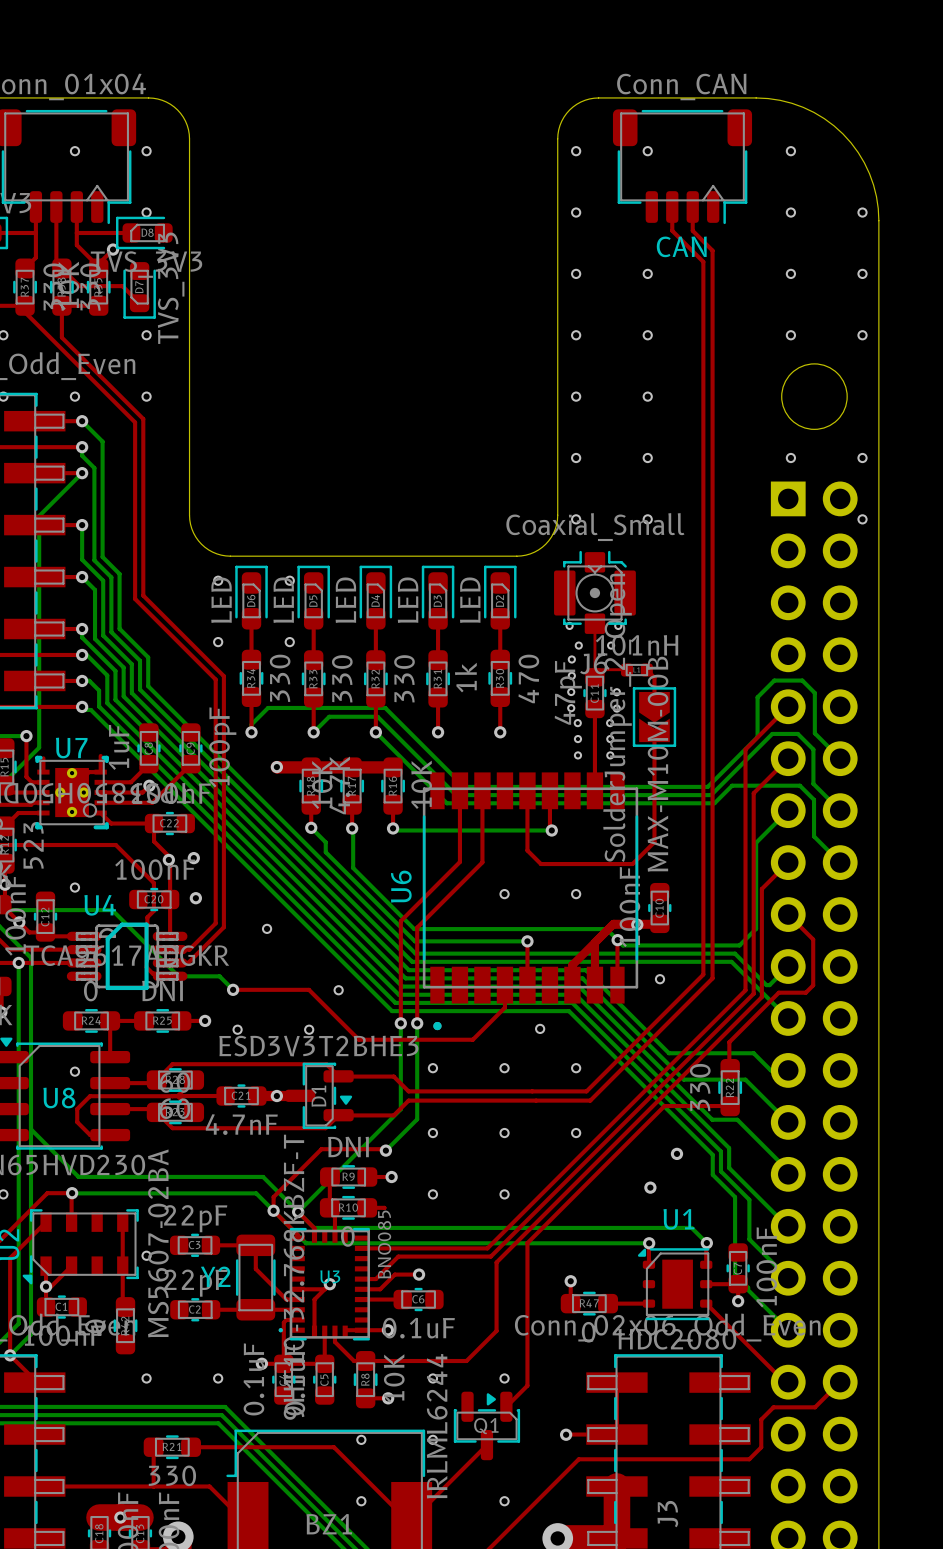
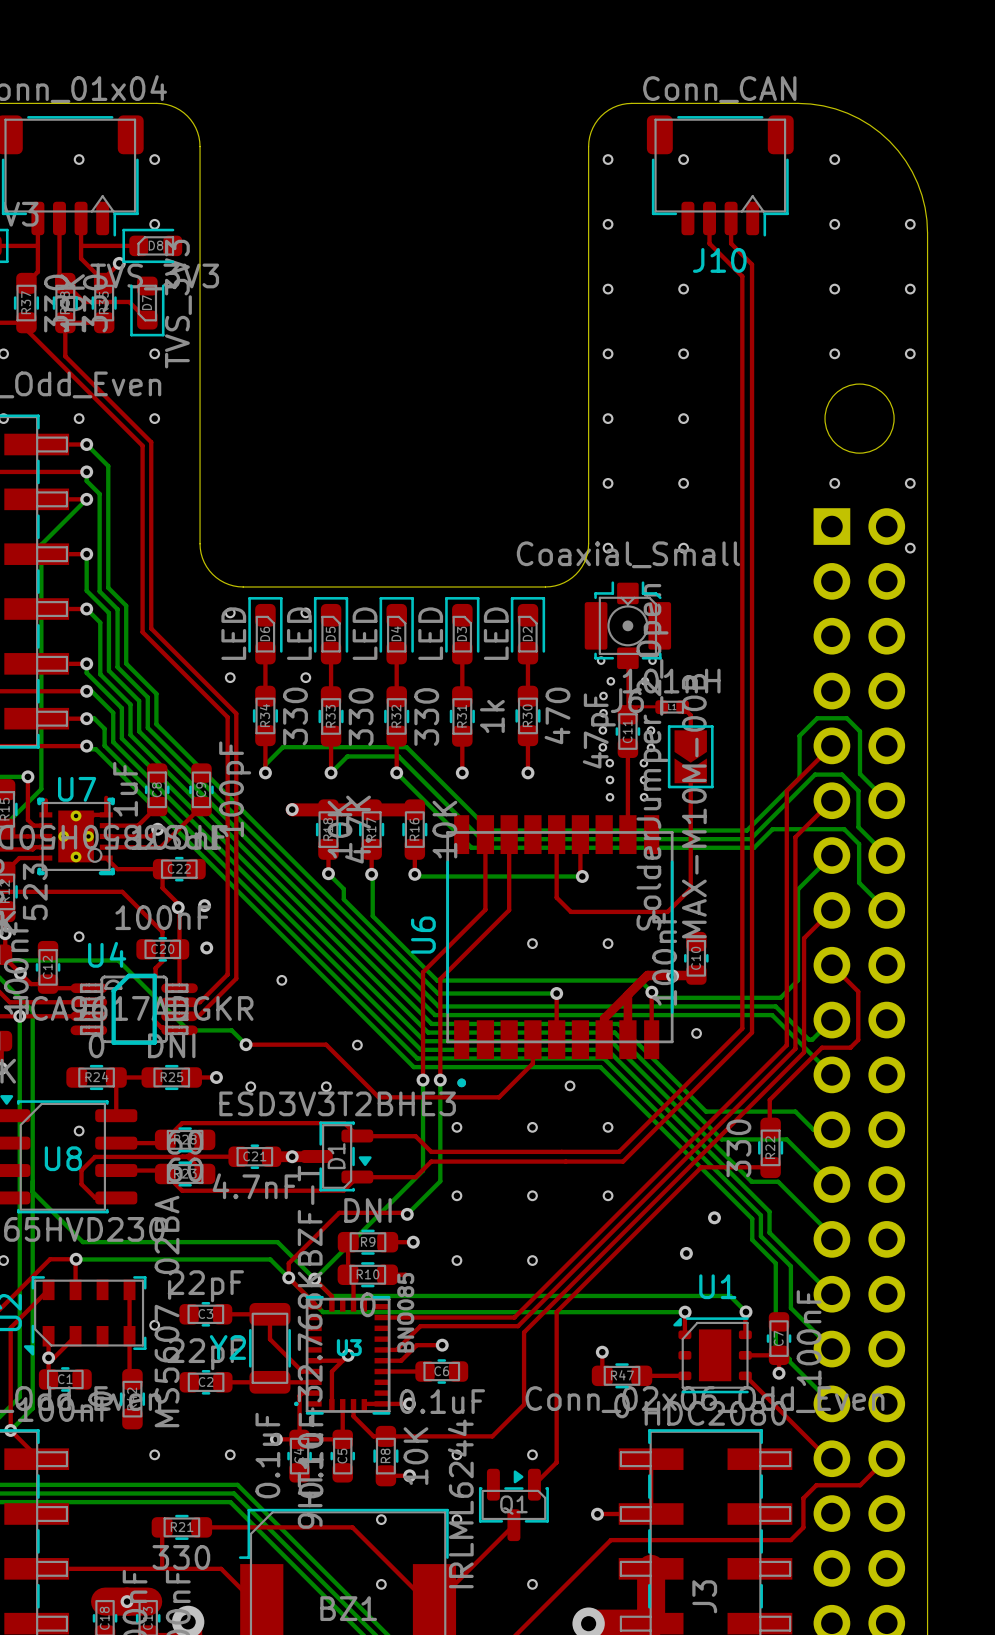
CAN name: CAN (681, 246) -> J10 (719, 260)

